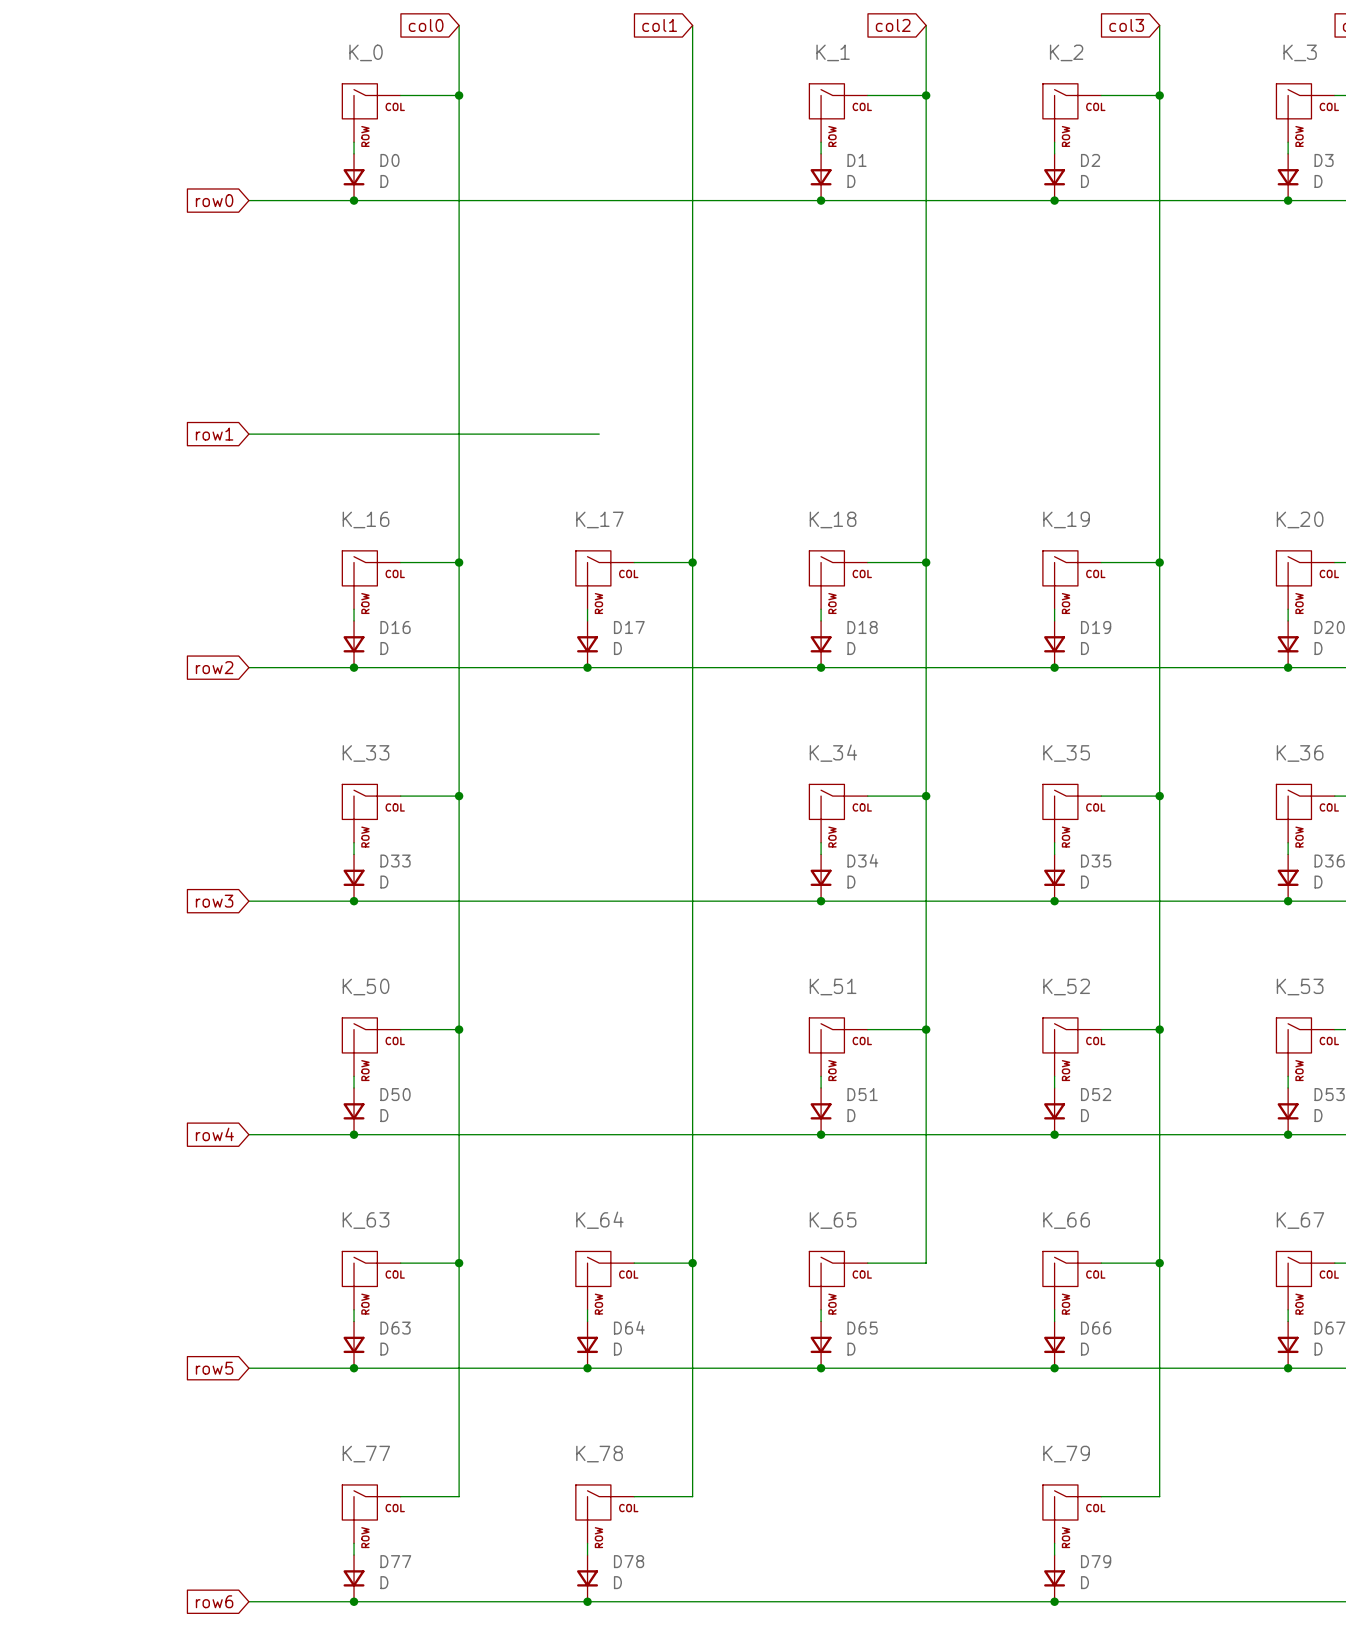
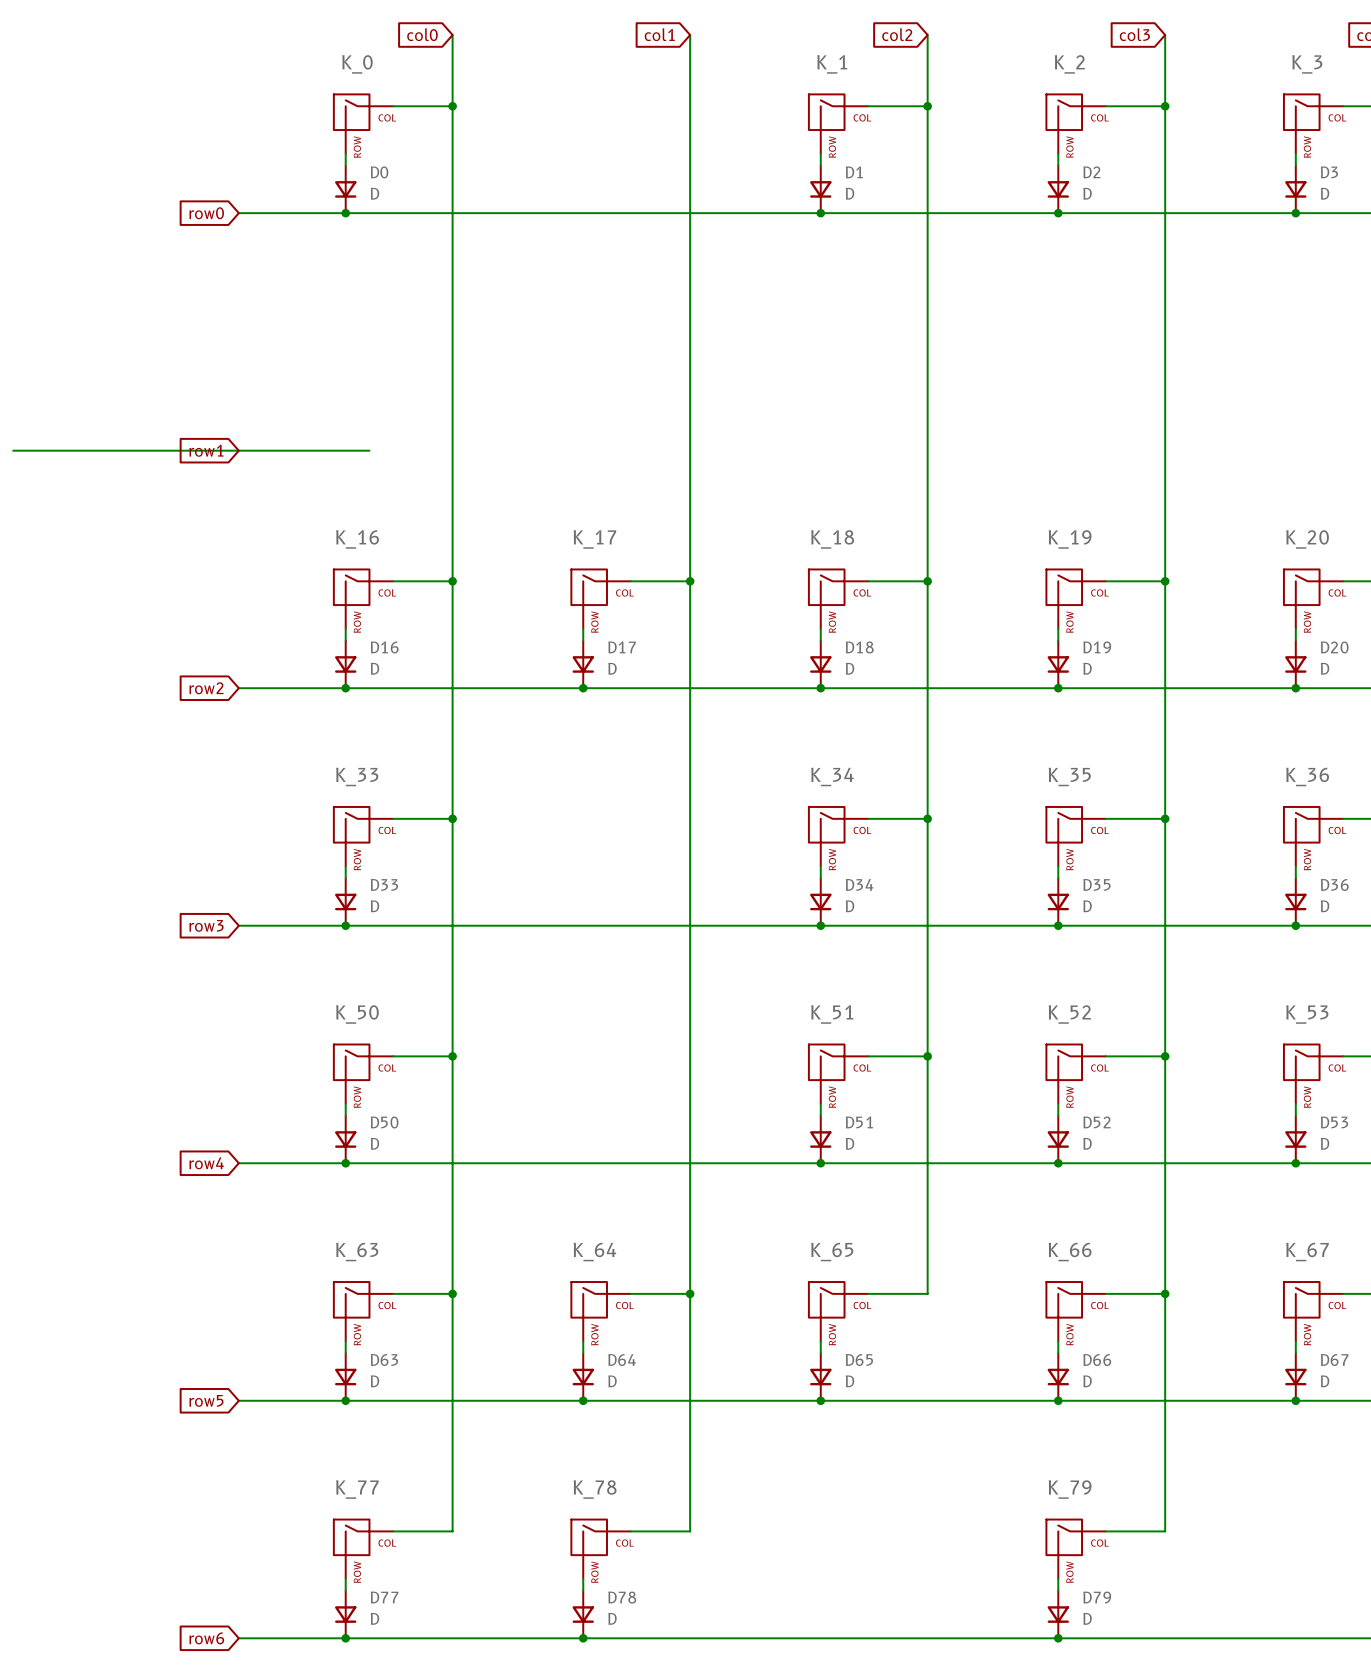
wire: none -> (13, 450) (238, 450)
wire: (377, 434) (599, 434) -> none

